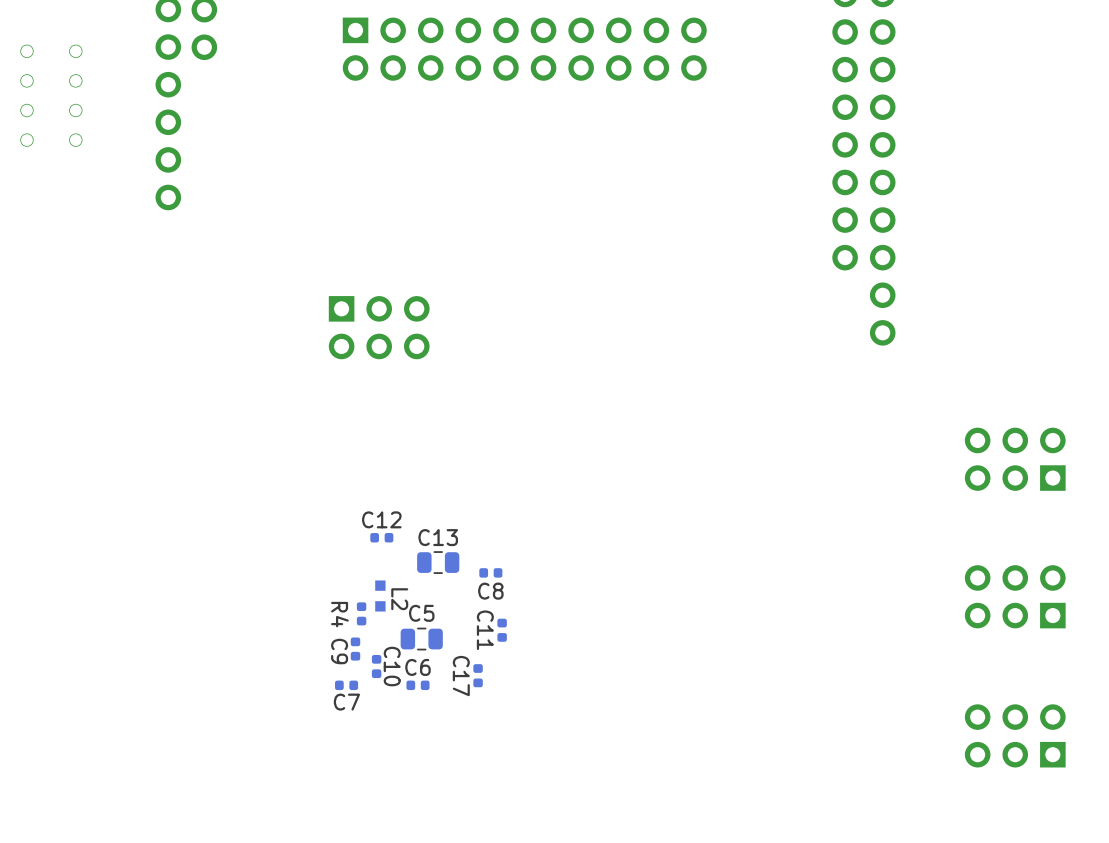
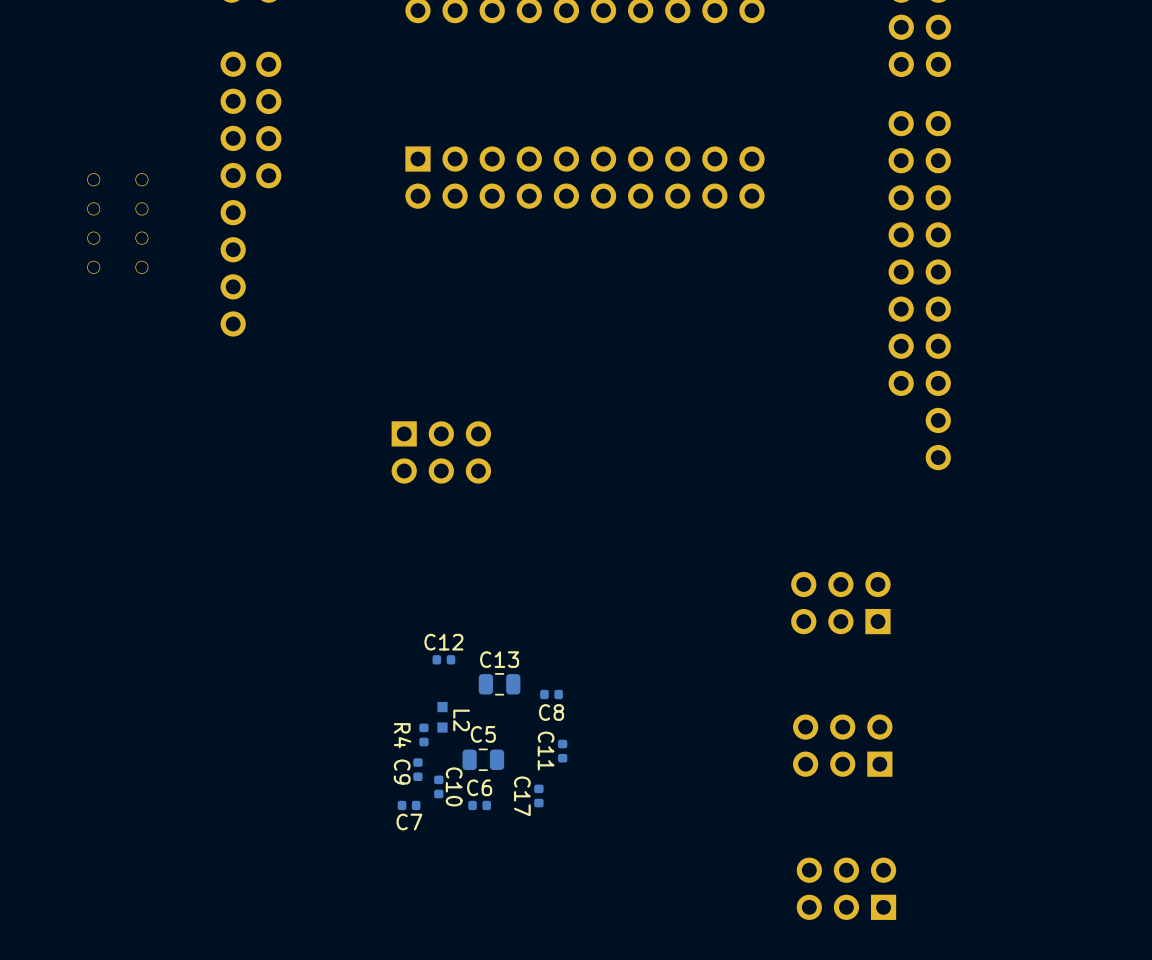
part: (1015, 459) -> none
part: none -> (840, 603)
part: (1015, 596) -> none
part: none -> (842, 745)
part: (1015, 735) -> none
part: none -> (846, 888)

